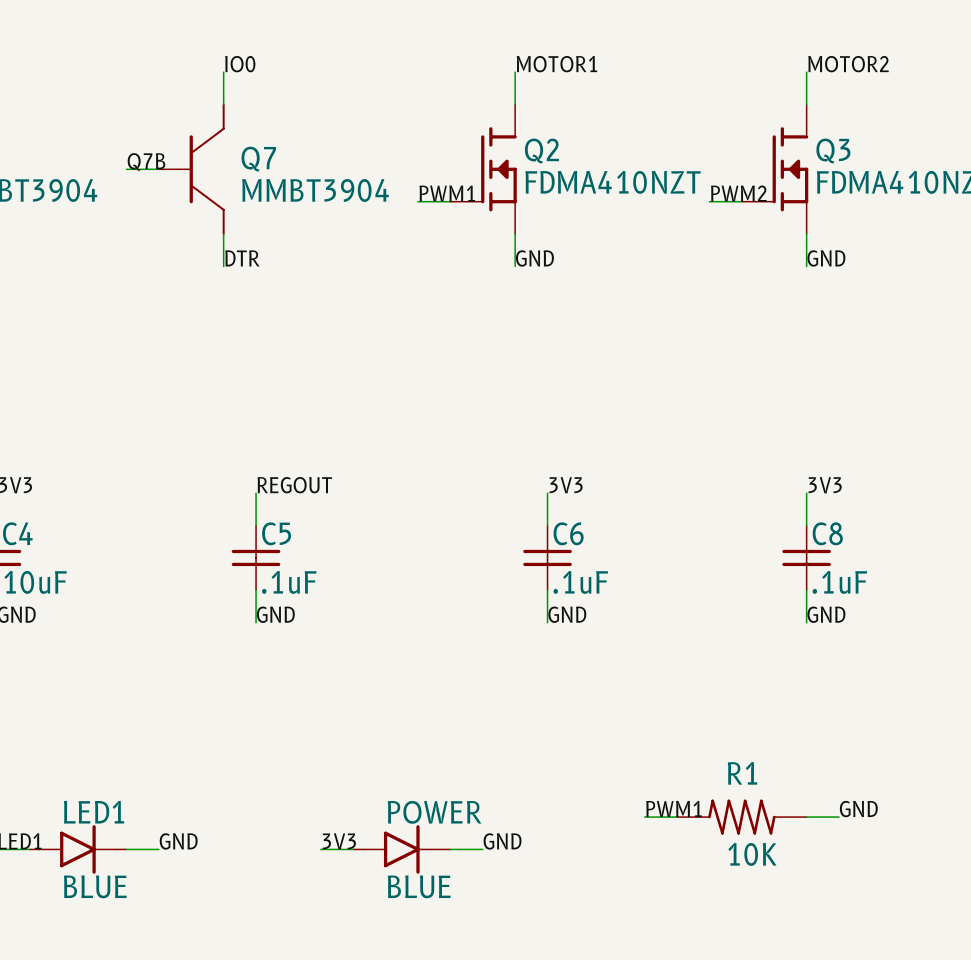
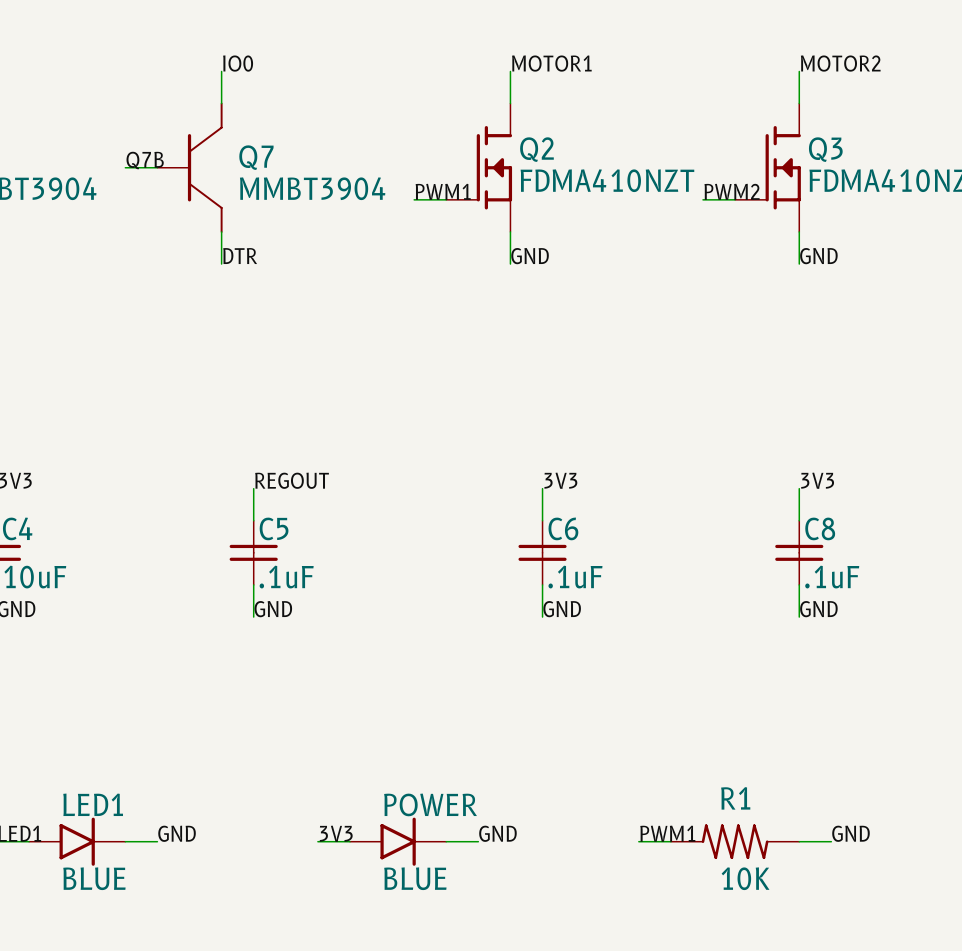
label position: PWM1 (673, 808) -> PWM1 (667, 833)
label position: GND (858, 809) -> GND (850, 833)
wire: (644, 817) (677, 817) -> (638, 841) (670, 841)
R1 position: (741, 817) -> (735, 841)
wire: (806, 817) (839, 817) -> (799, 841) (831, 841)

